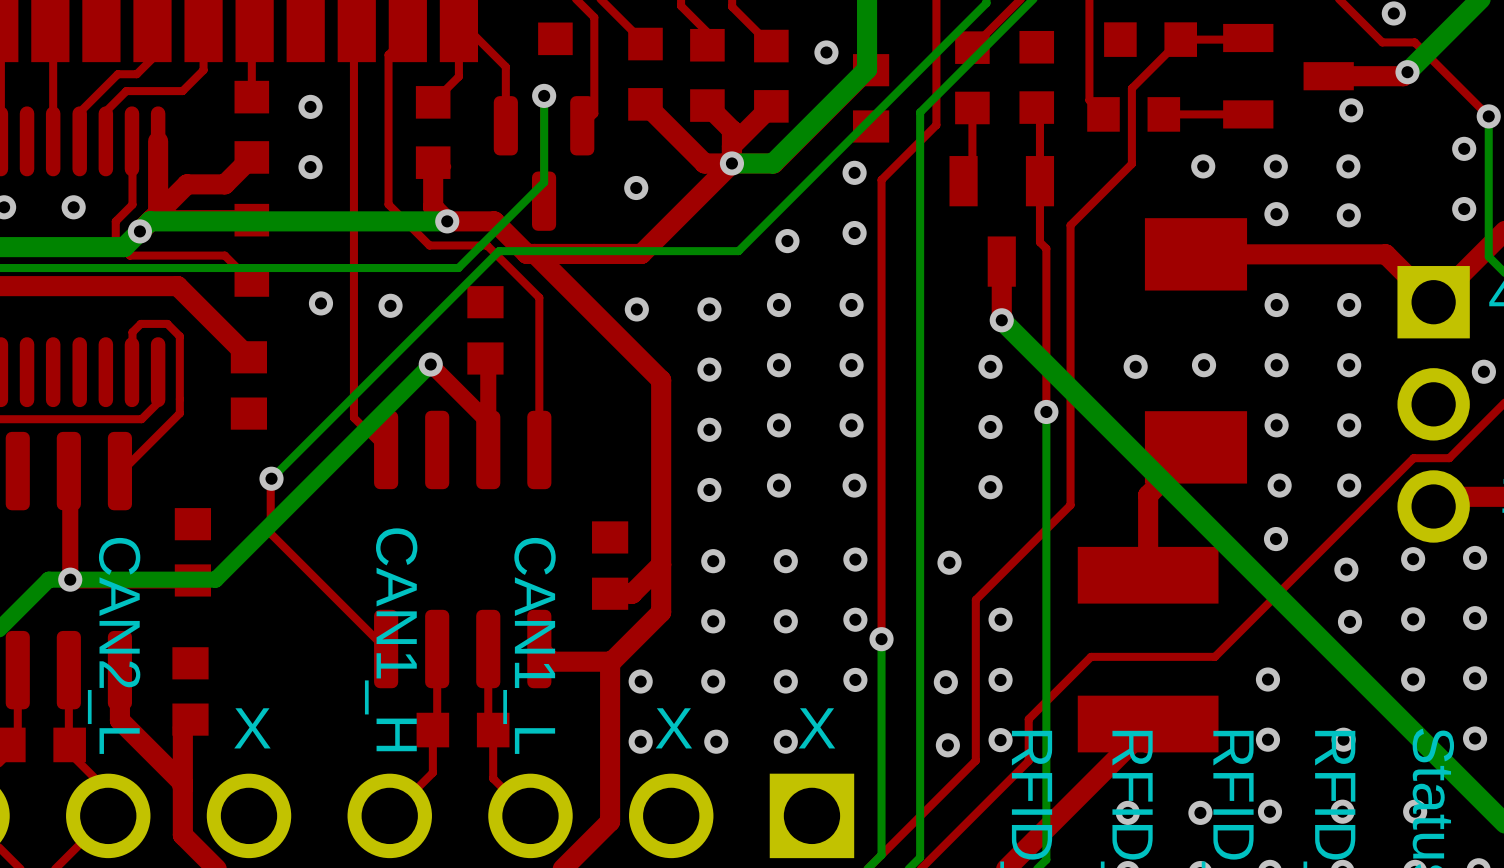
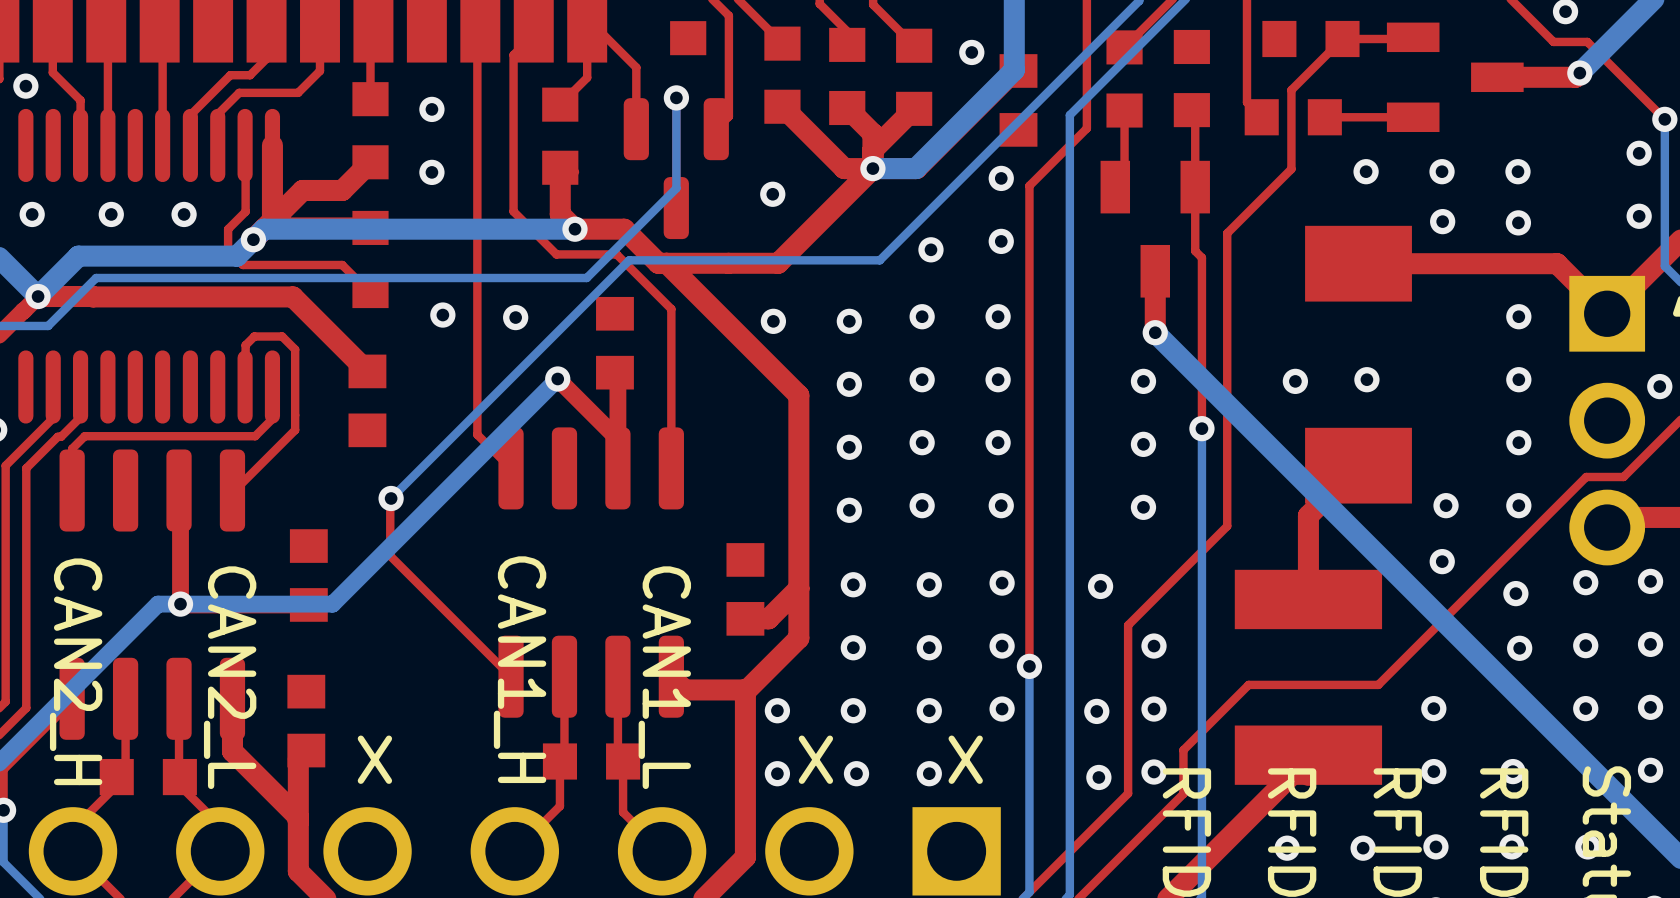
via: (1351, 110) -> none
via: (1276, 305) -> none
via: (1276, 365) -> none
via: (1276, 425) -> none

